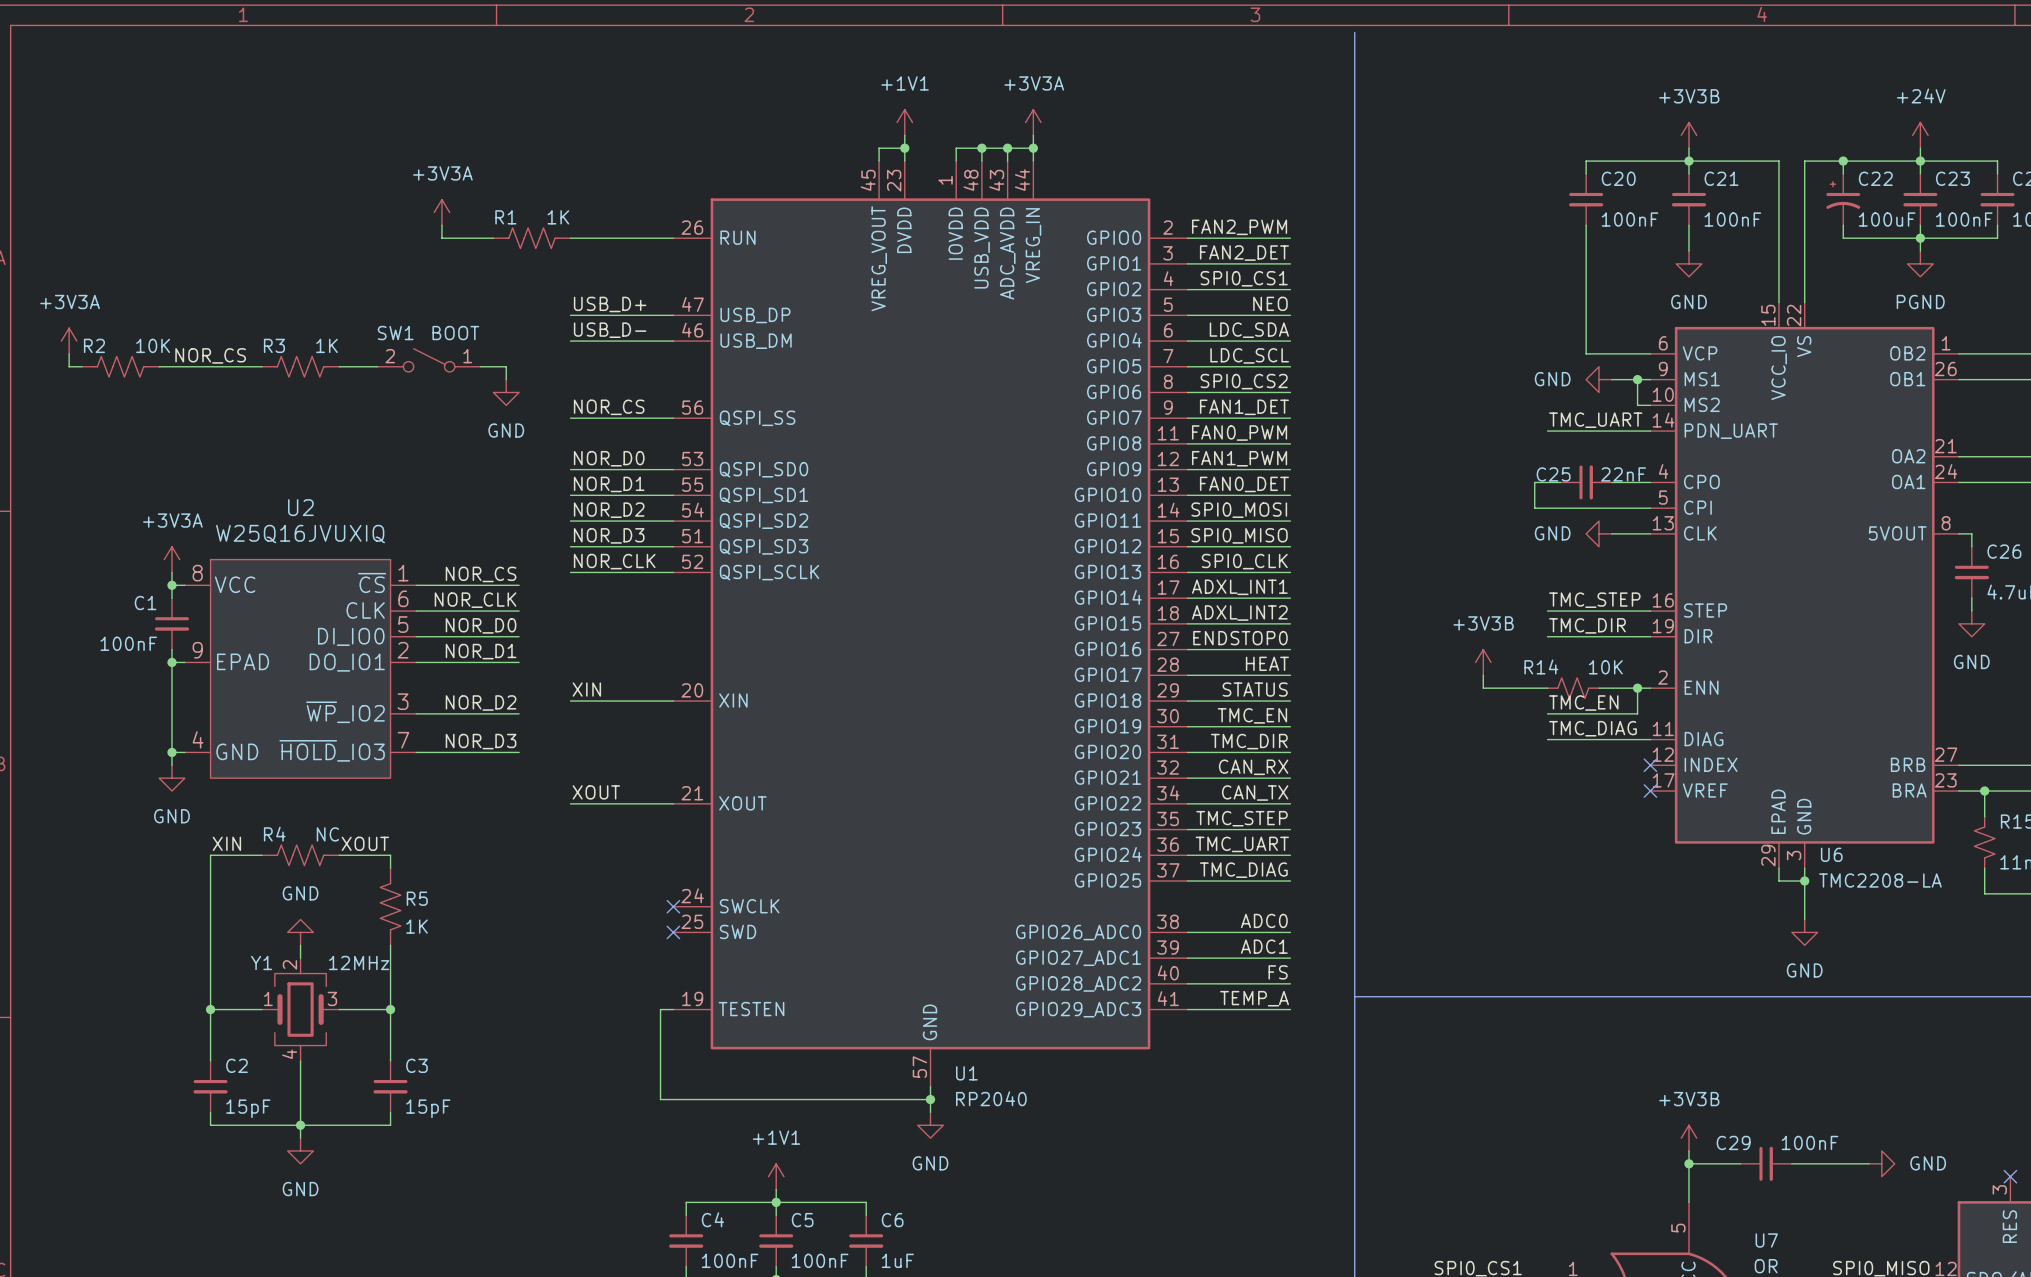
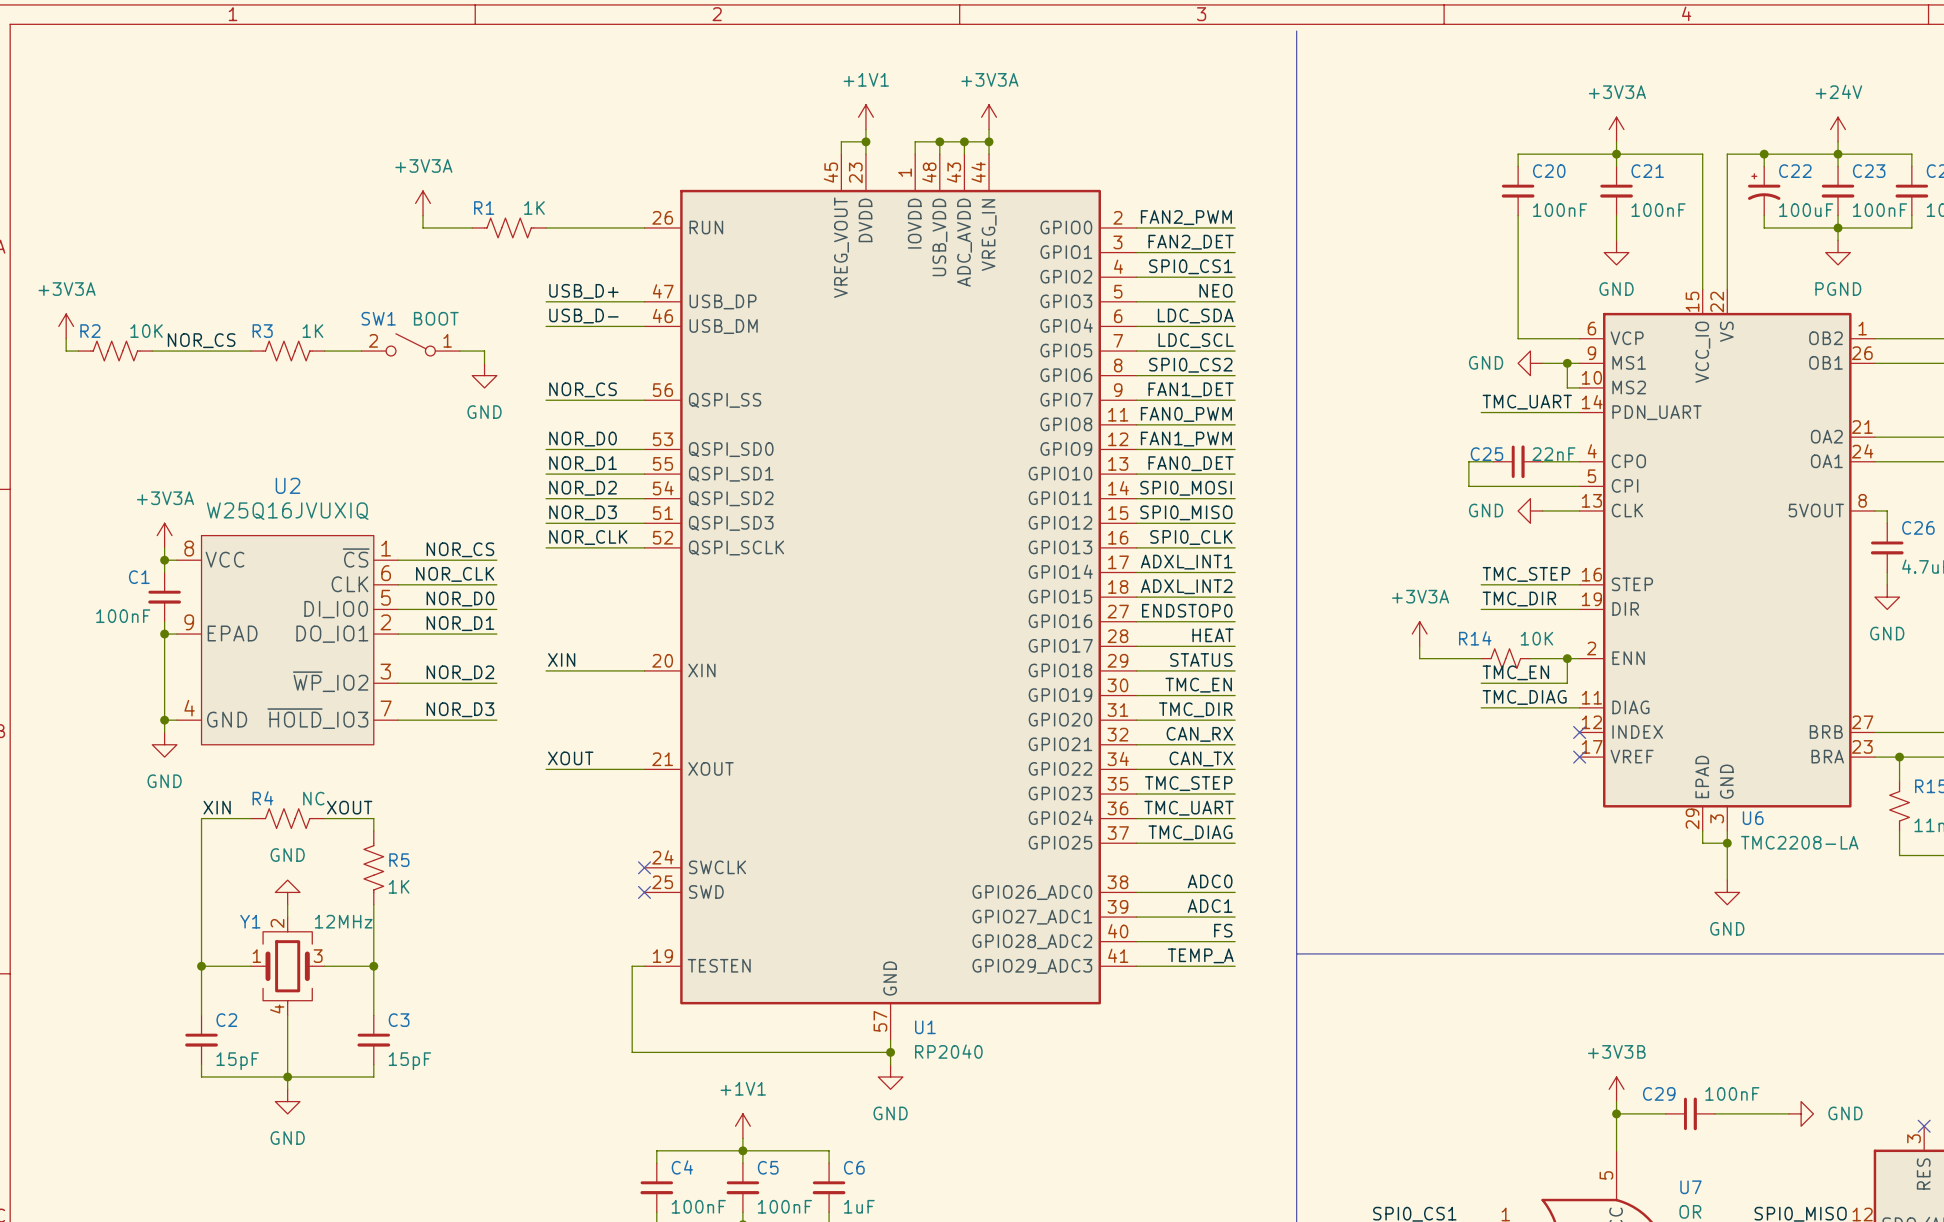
power symbol: +3V3B (1688, 135) -> +3V3A (1616, 129)
power symbol: +3V3B (1483, 662) -> +3V3A (1419, 634)

